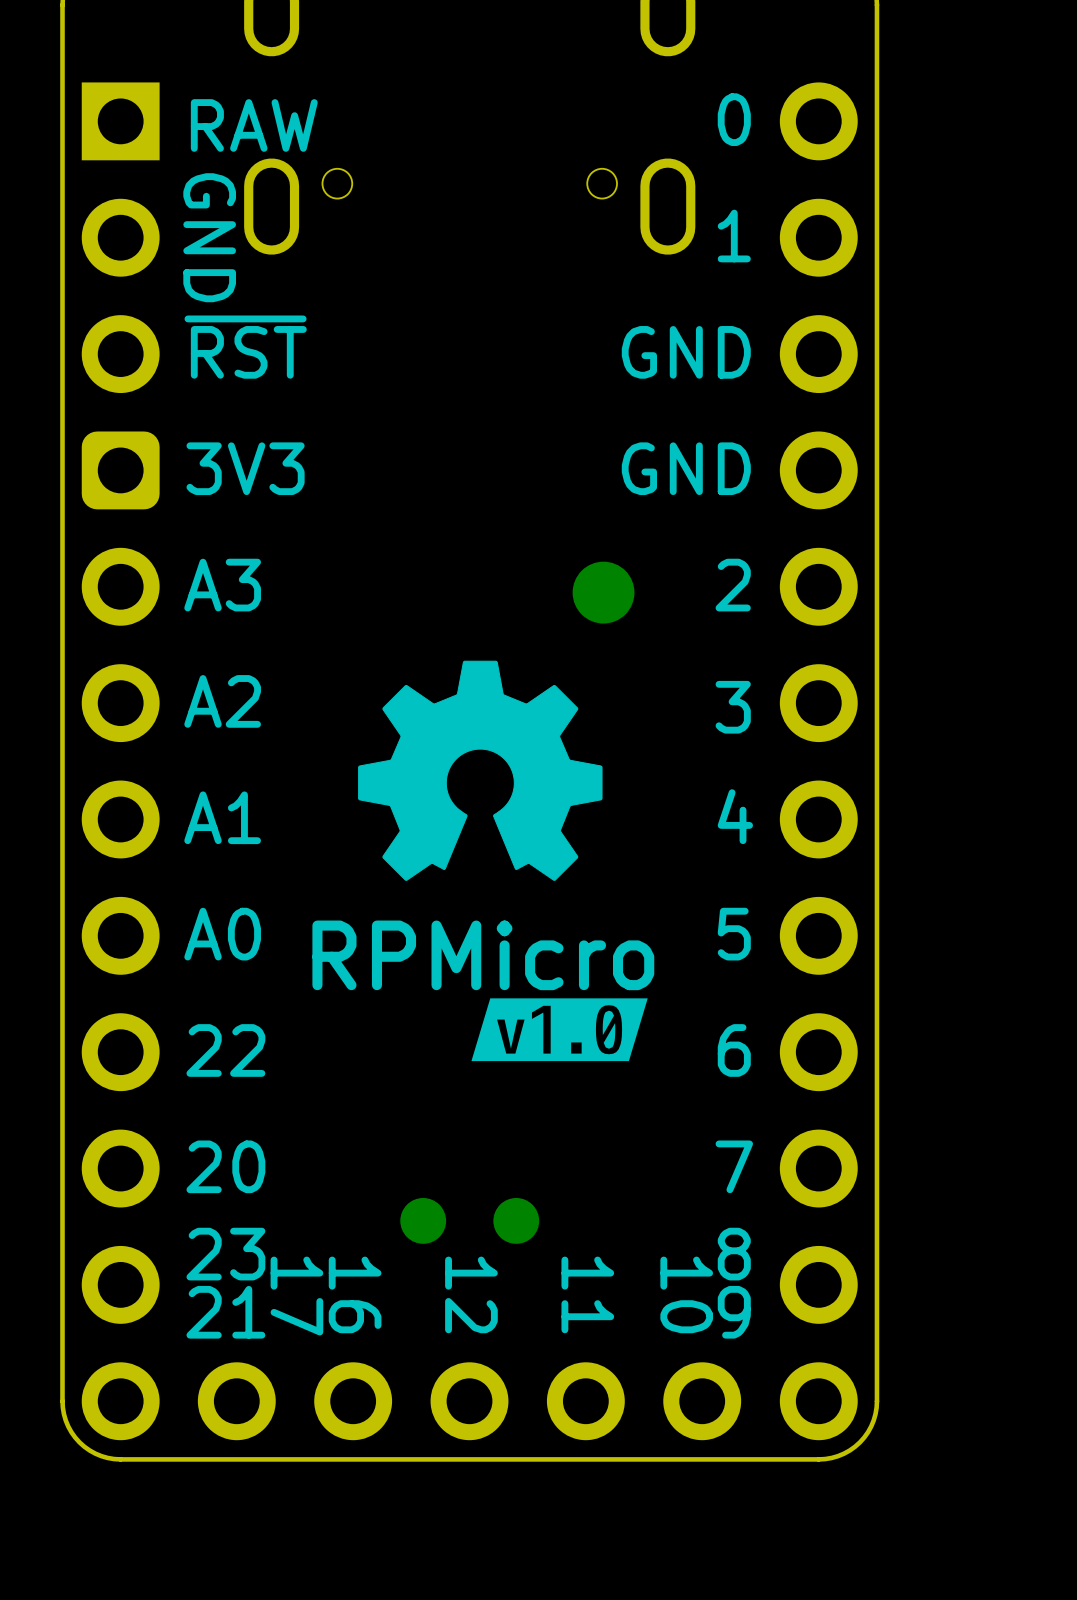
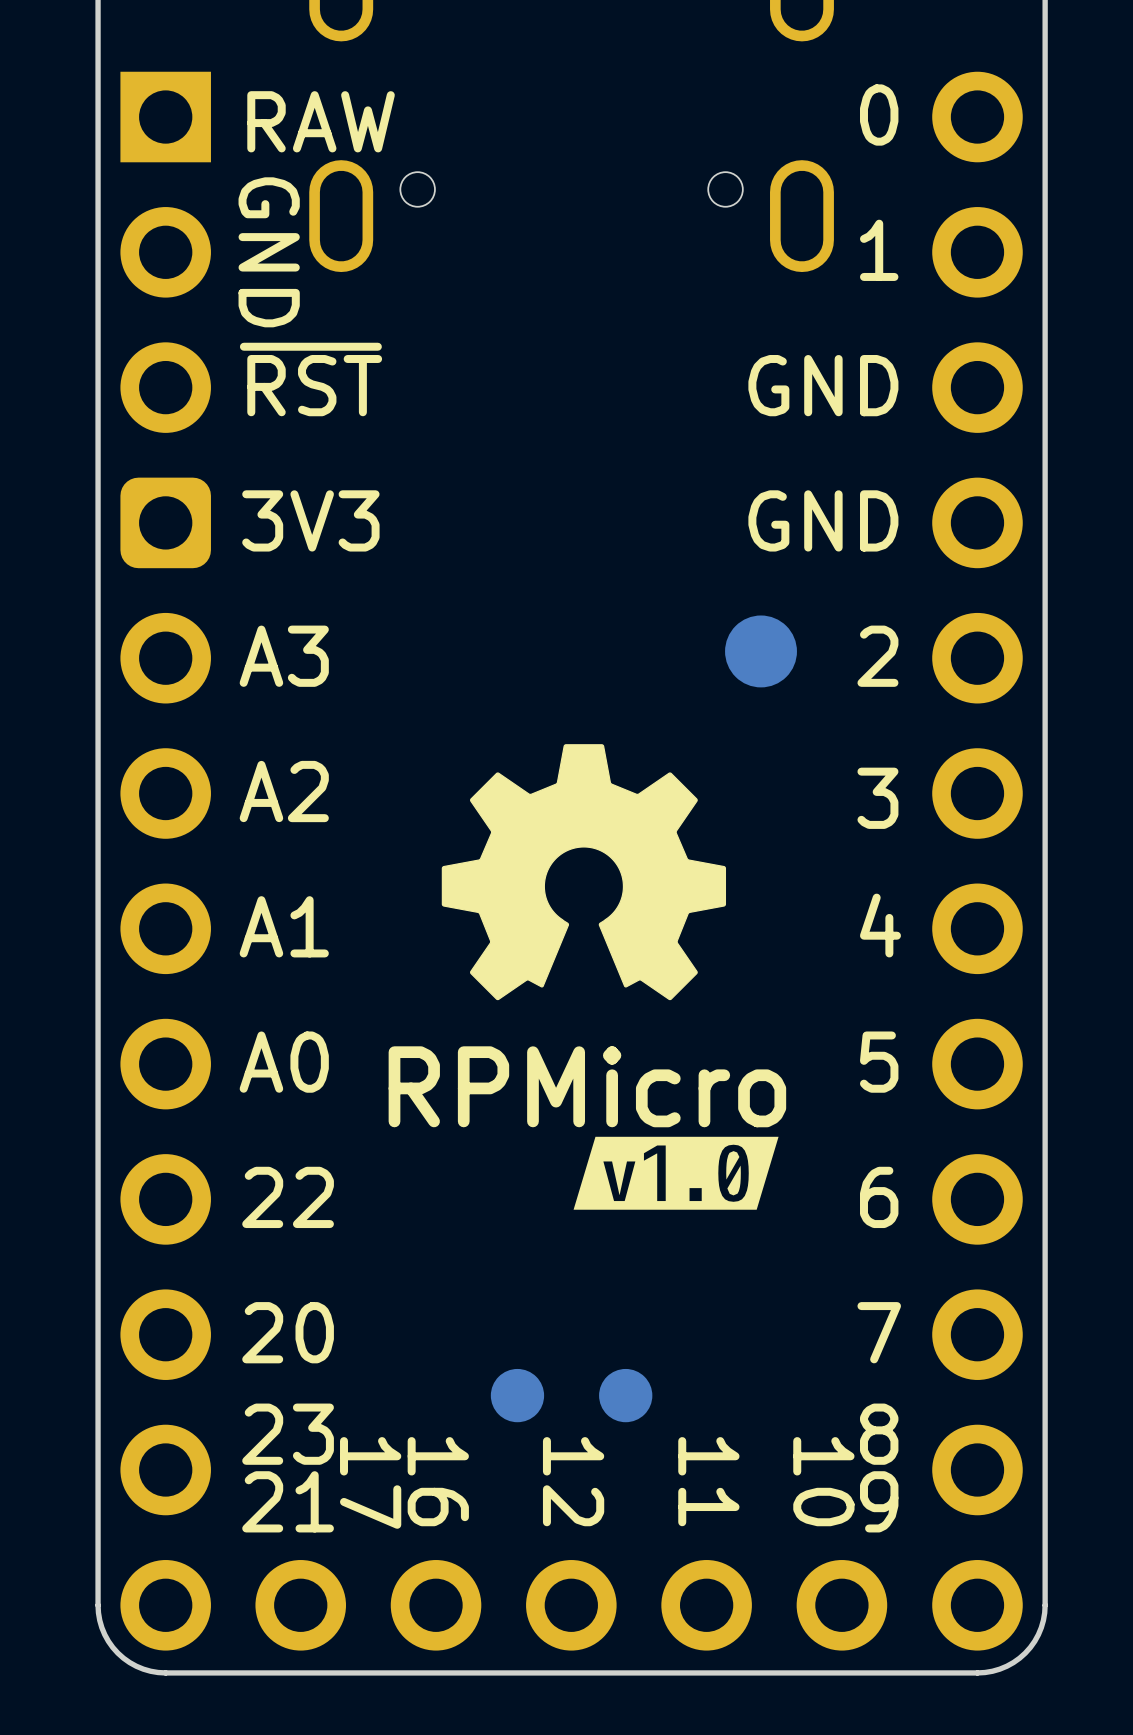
part position: (603, 592) -> (761, 651)

